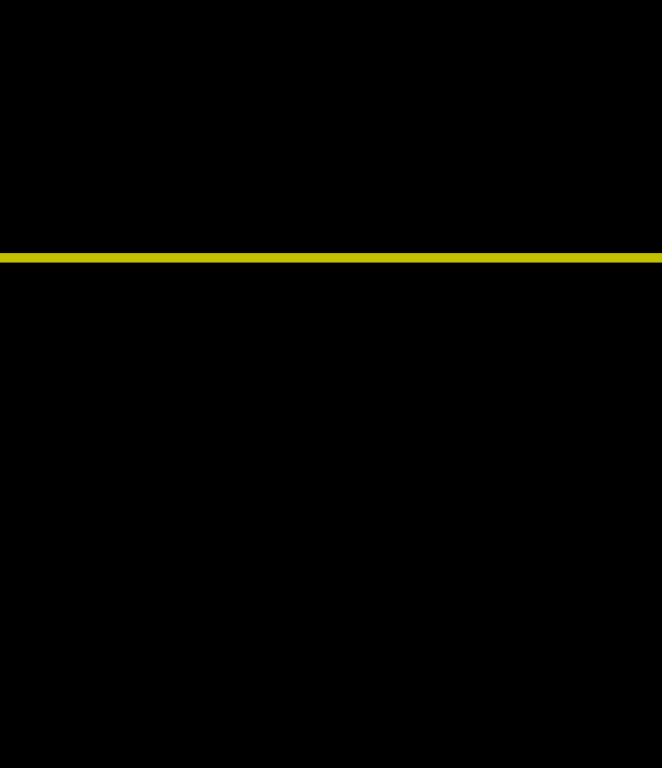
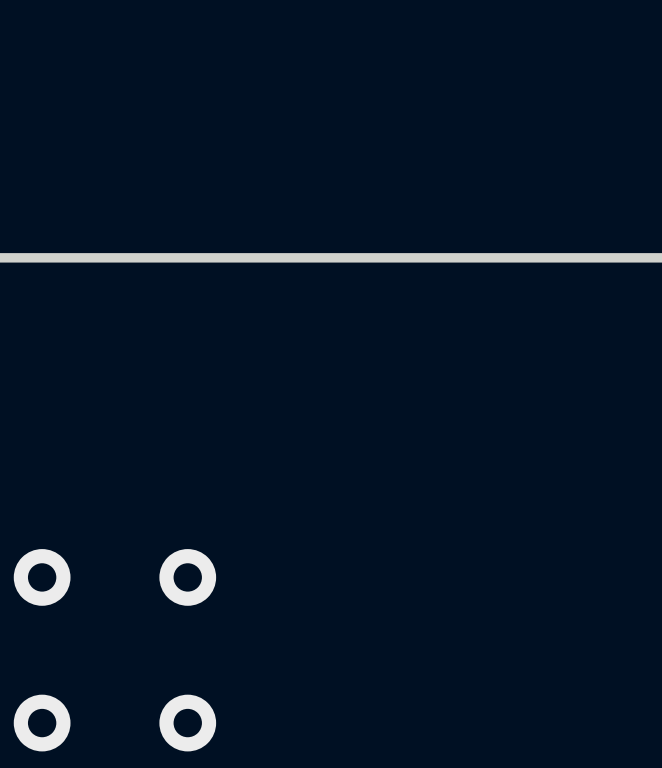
via: none -> (42, 577)
via: none -> (187, 577)
via: none -> (42, 723)
via: none -> (187, 723)

